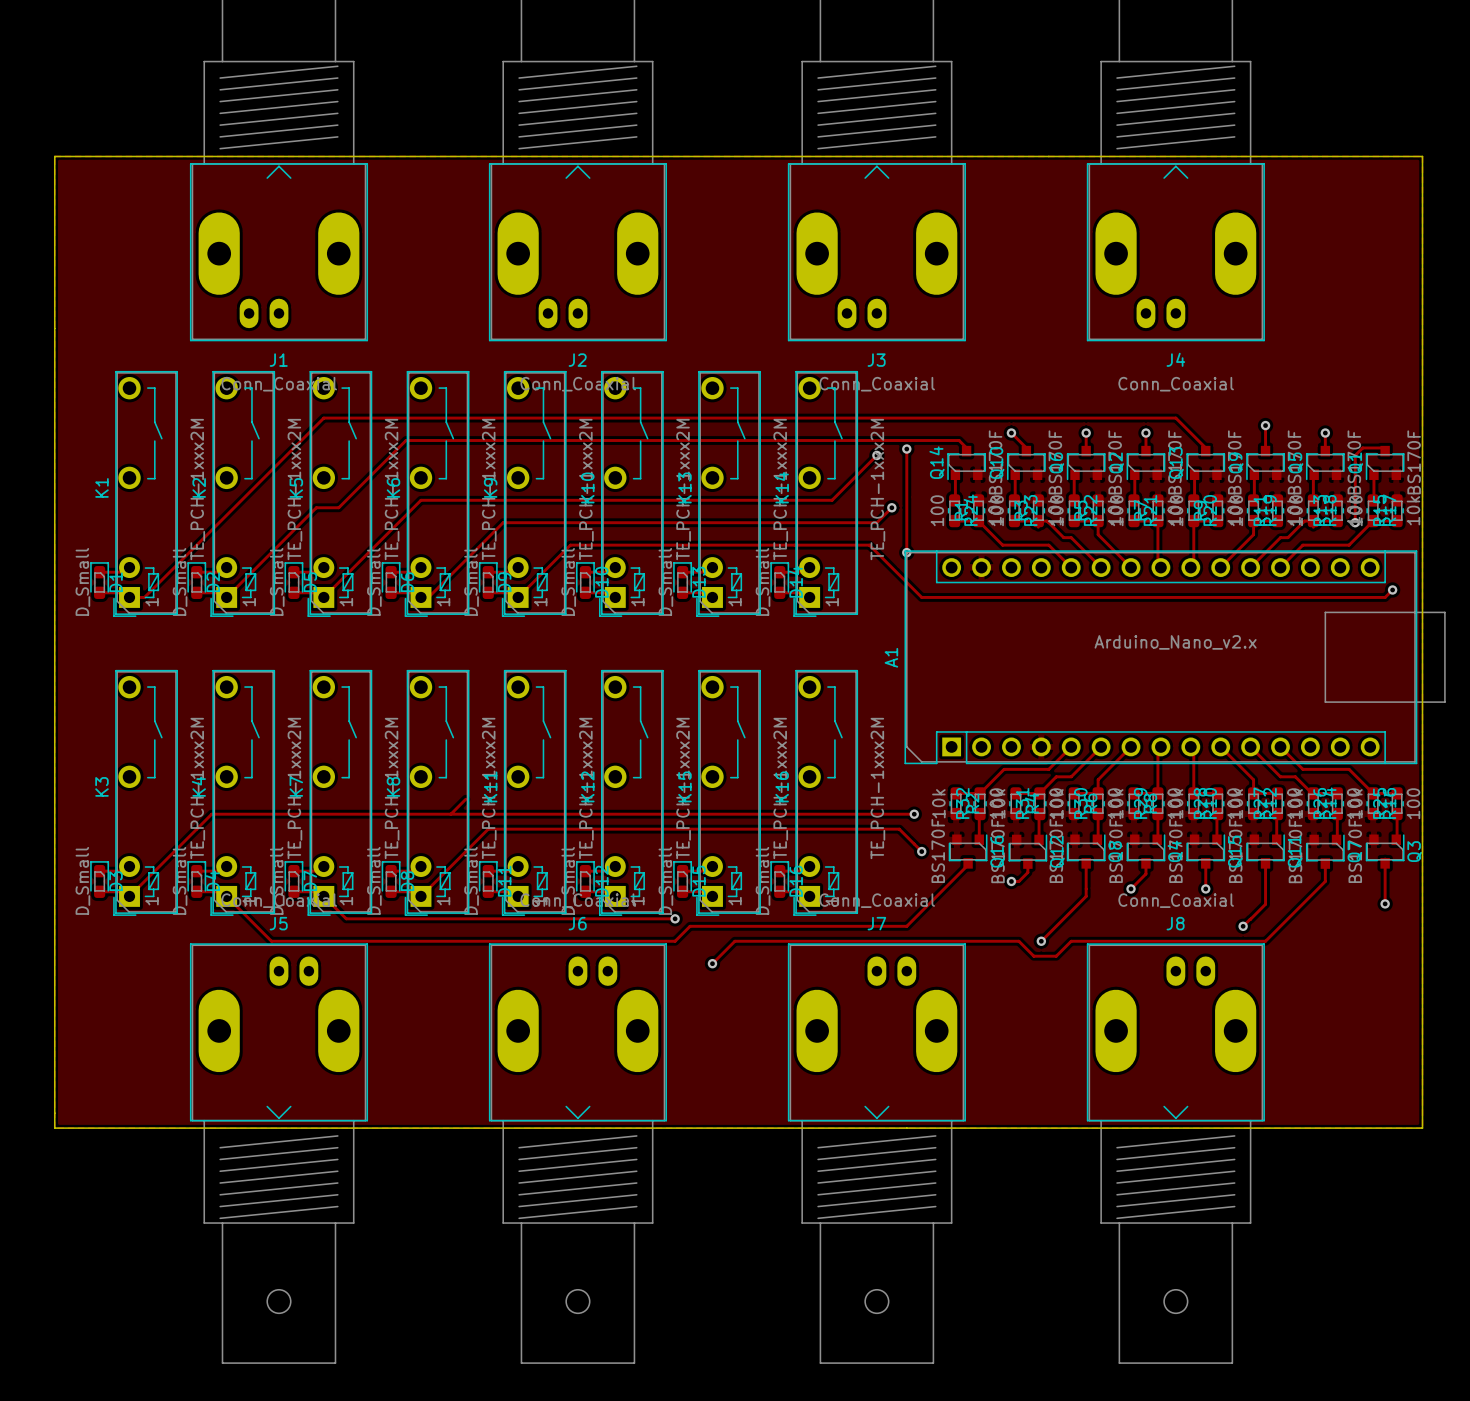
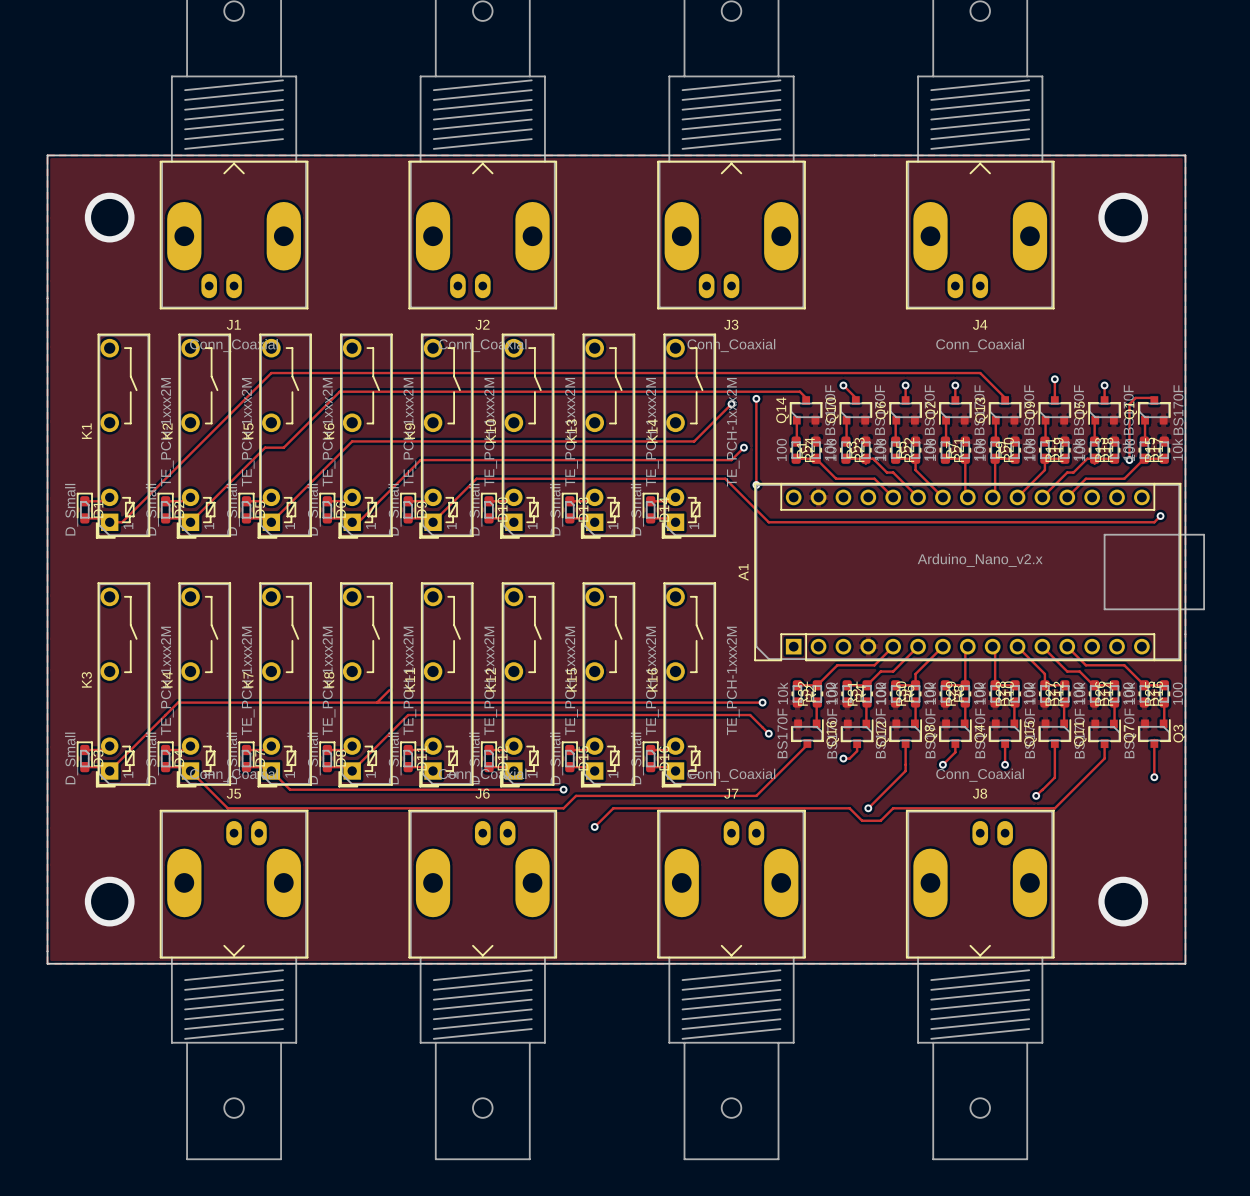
via: none -> (109, 217)
via: none -> (1123, 217)
via: none -> (109, 901)
via: none -> (1123, 901)

